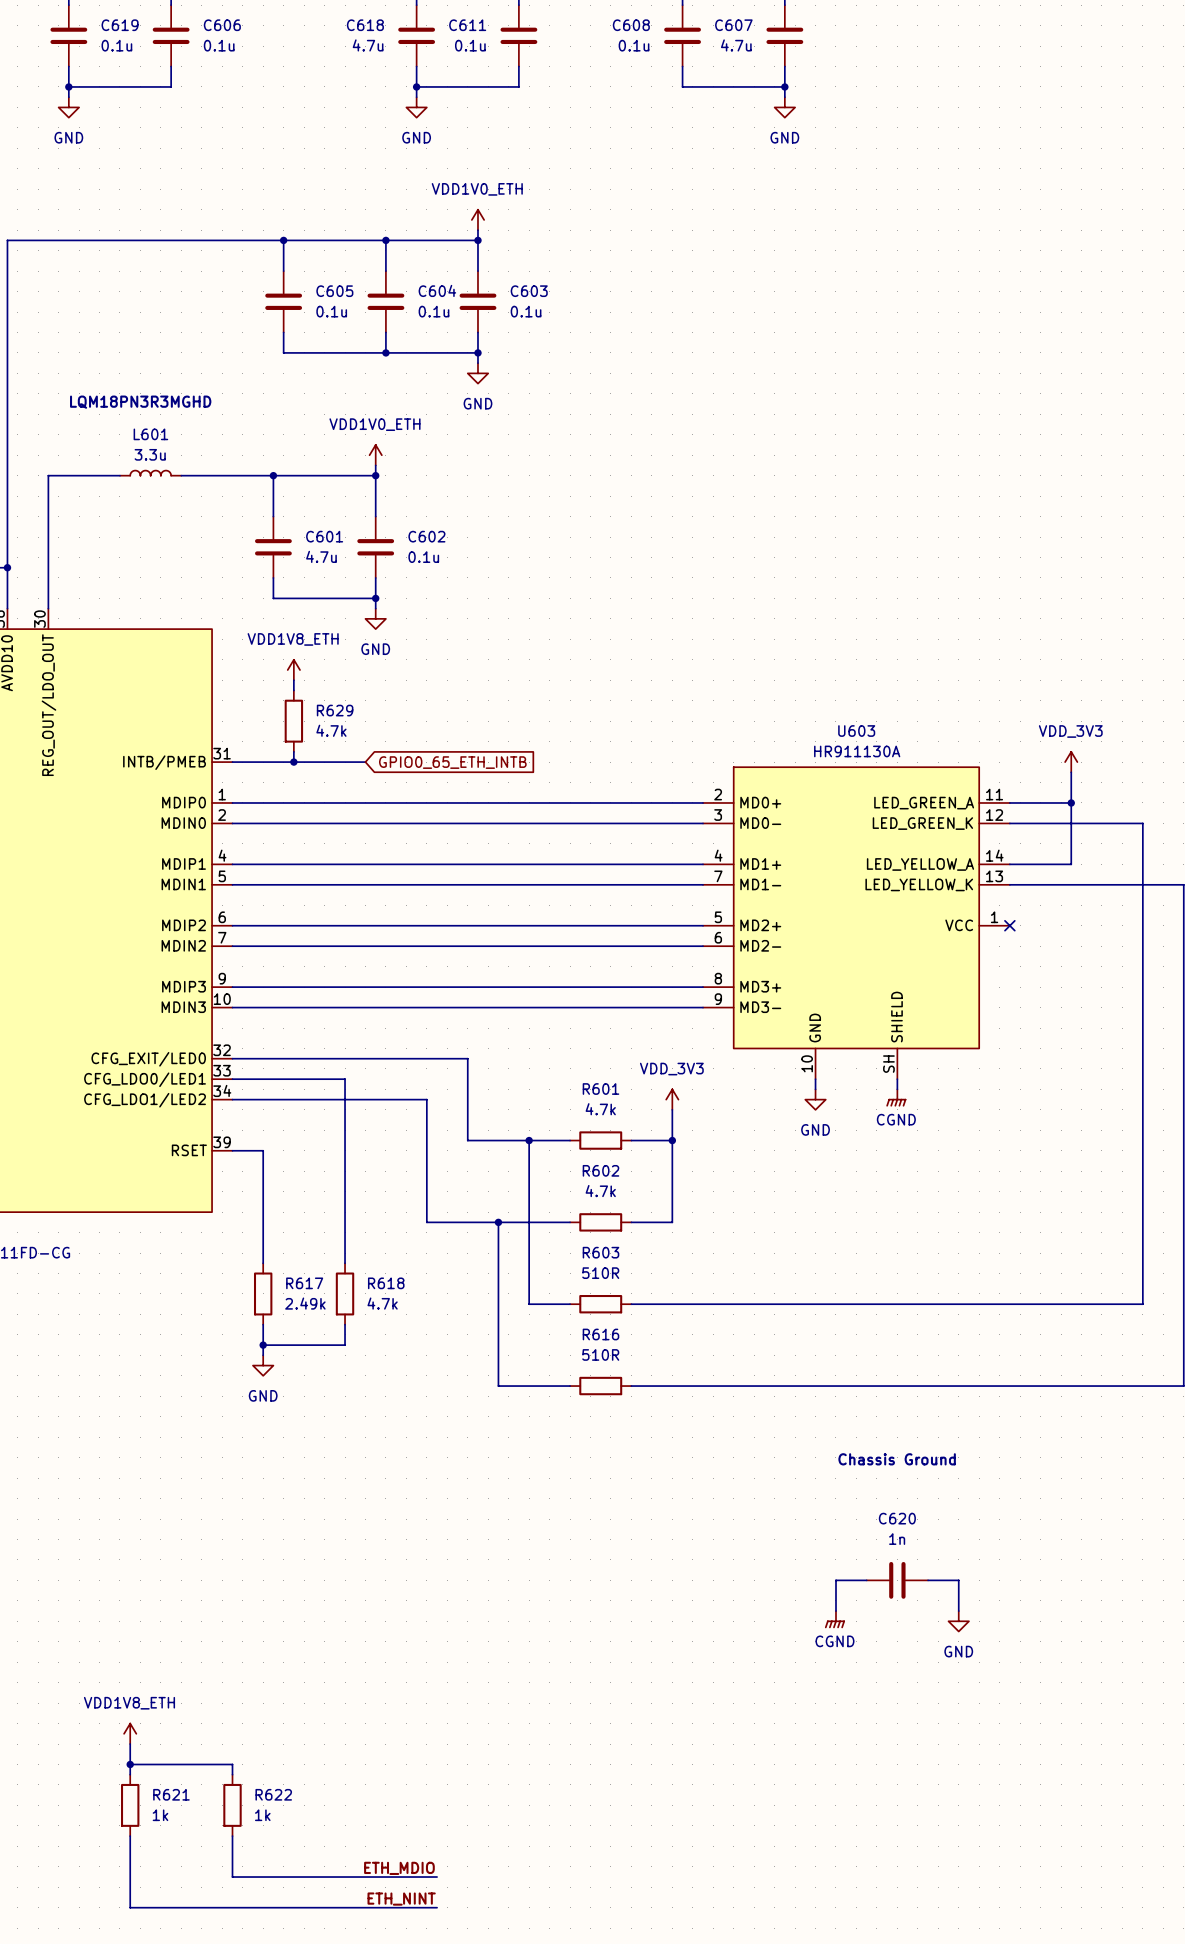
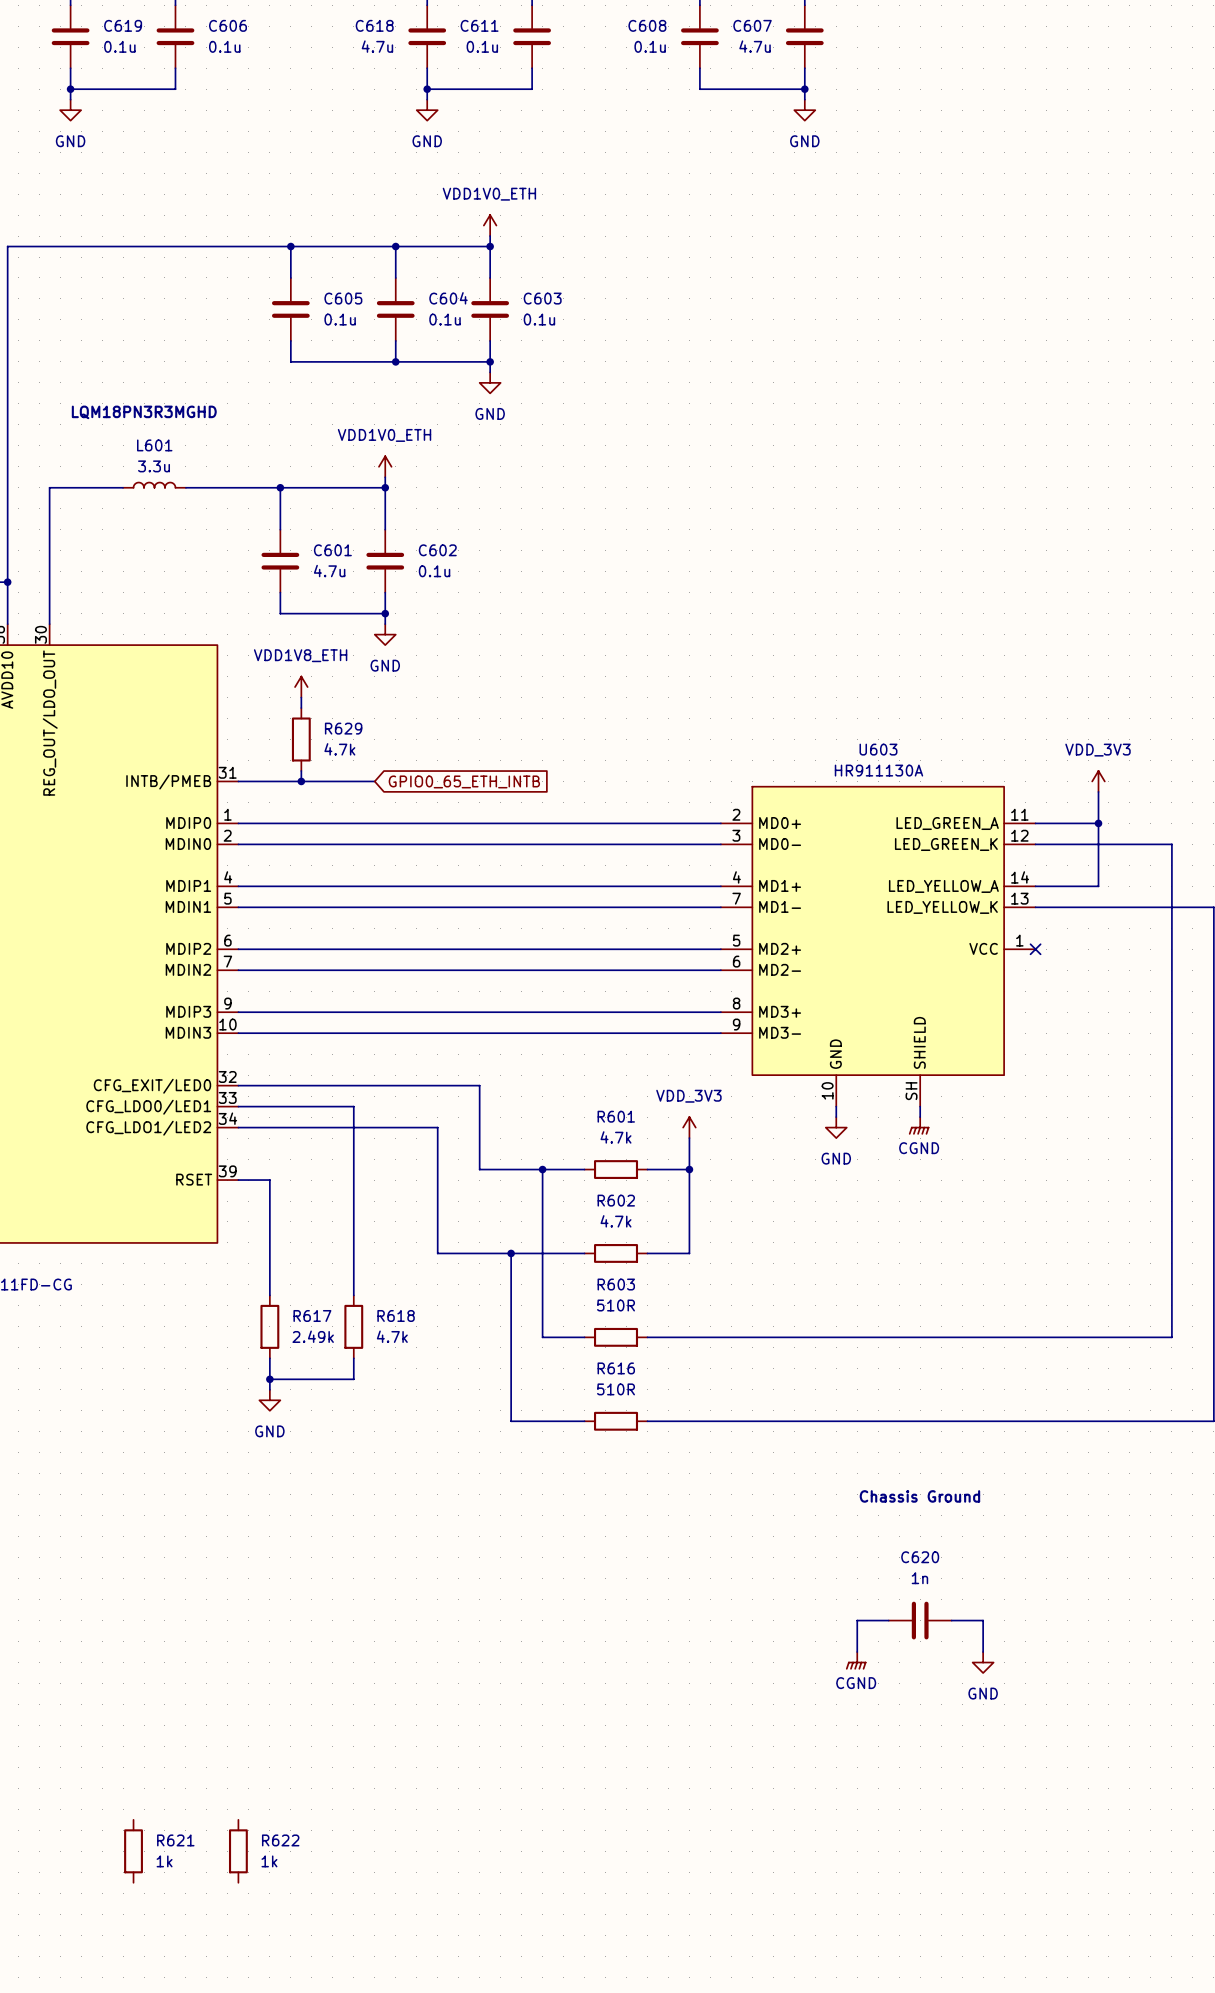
power symbol: VDD1V8_ETH (130, 1733) -> none
wire: (130, 1744) (130, 1774) -> none
wire: (130, 1764) (232, 1764) (232, 1774) -> none
junction: (130, 1764) -> none
wire: (130, 1836) (130, 1907) (437, 1907) -> none
wire: (232, 1836) (232, 1877) (437, 1877) -> none
label: ETH_MDIO (399, 1868) -> none
label: ETH_NINT (401, 1899) -> none

